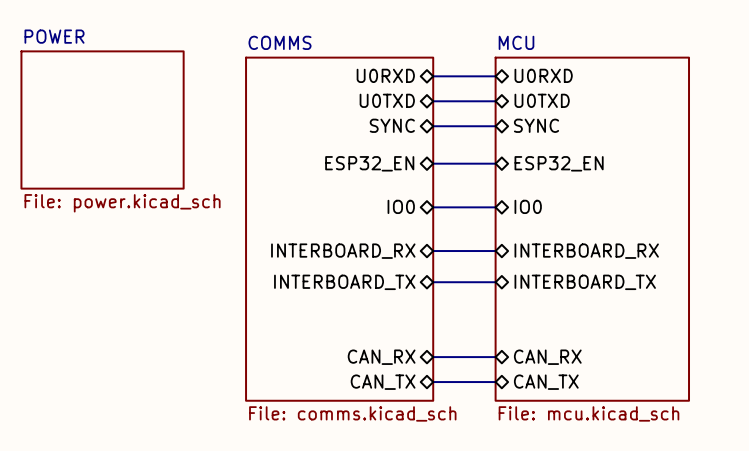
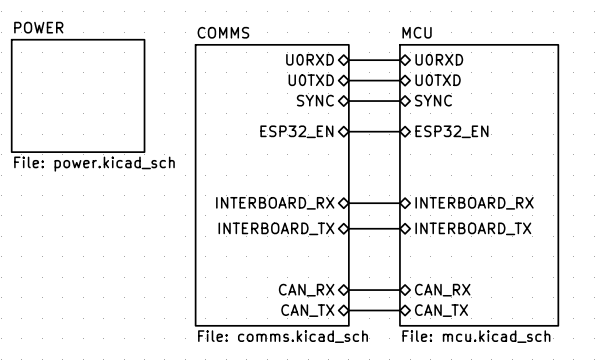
sheet pin: IO0 (401, 206) -> none
sheet pin: IO0 (528, 206) -> none
wire: (433, 207) (495, 207) -> none

